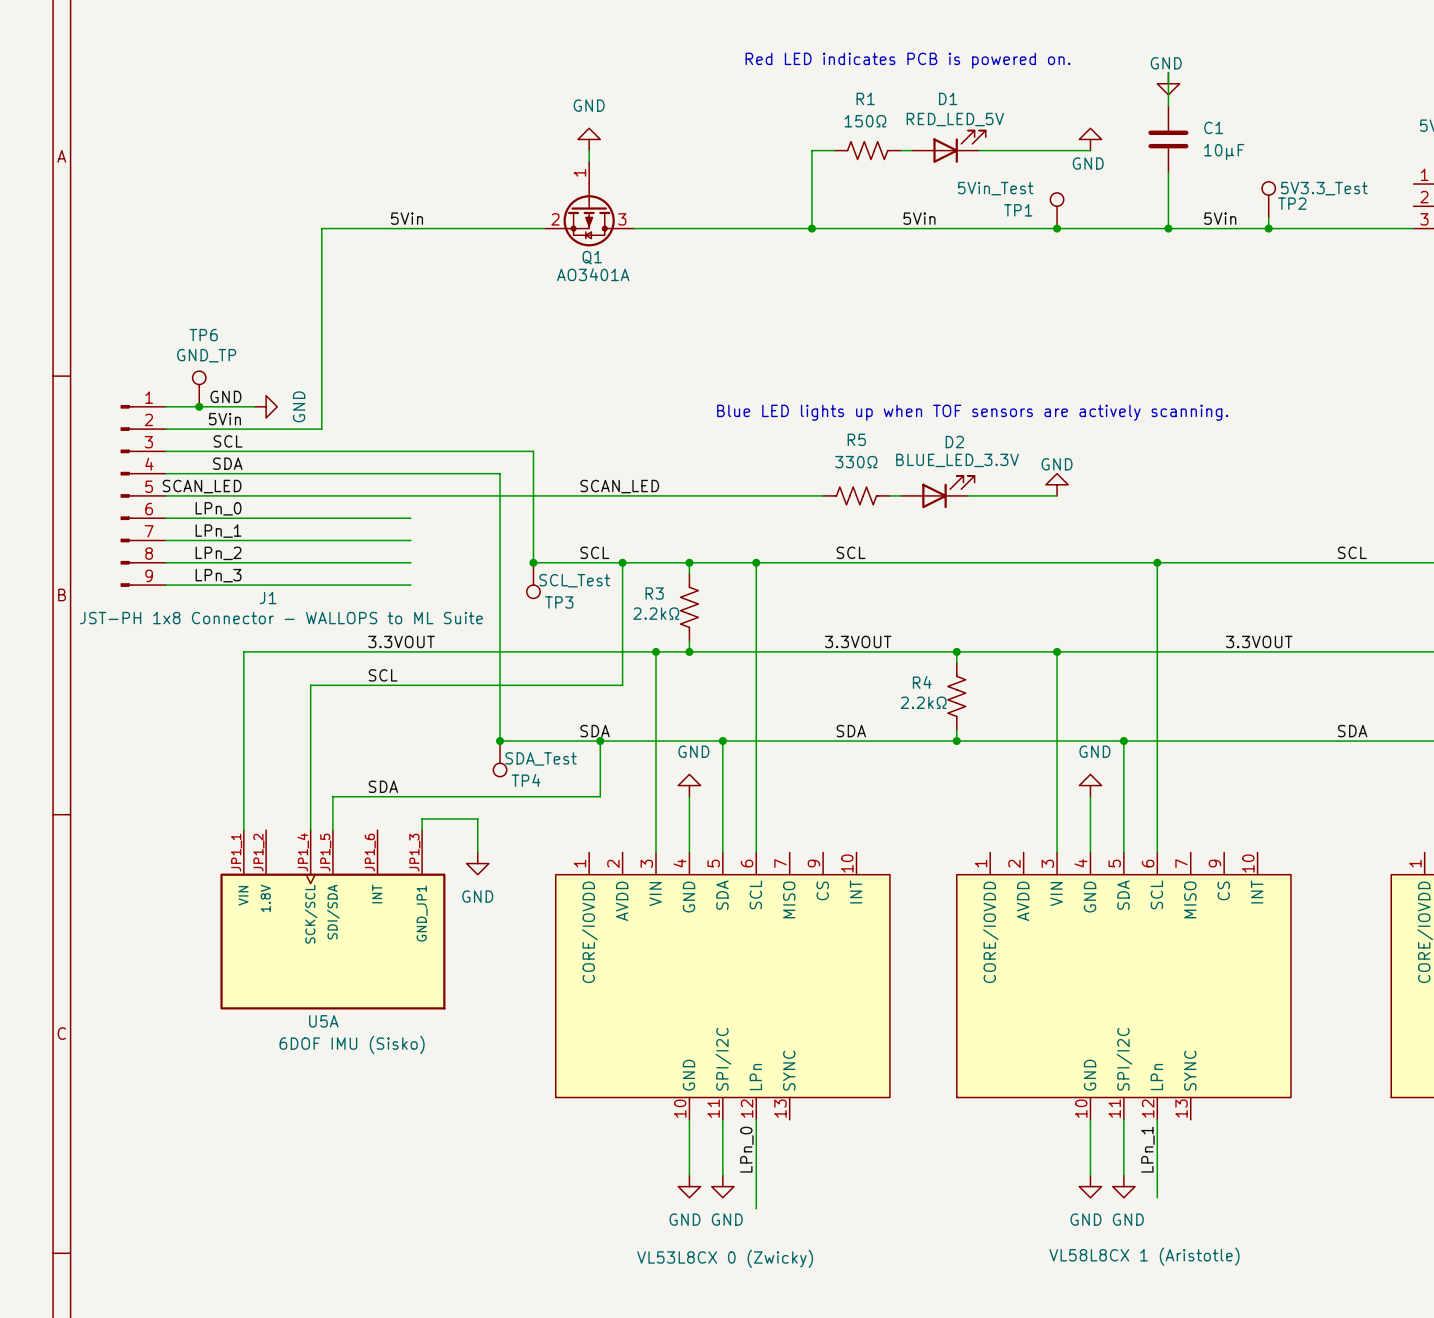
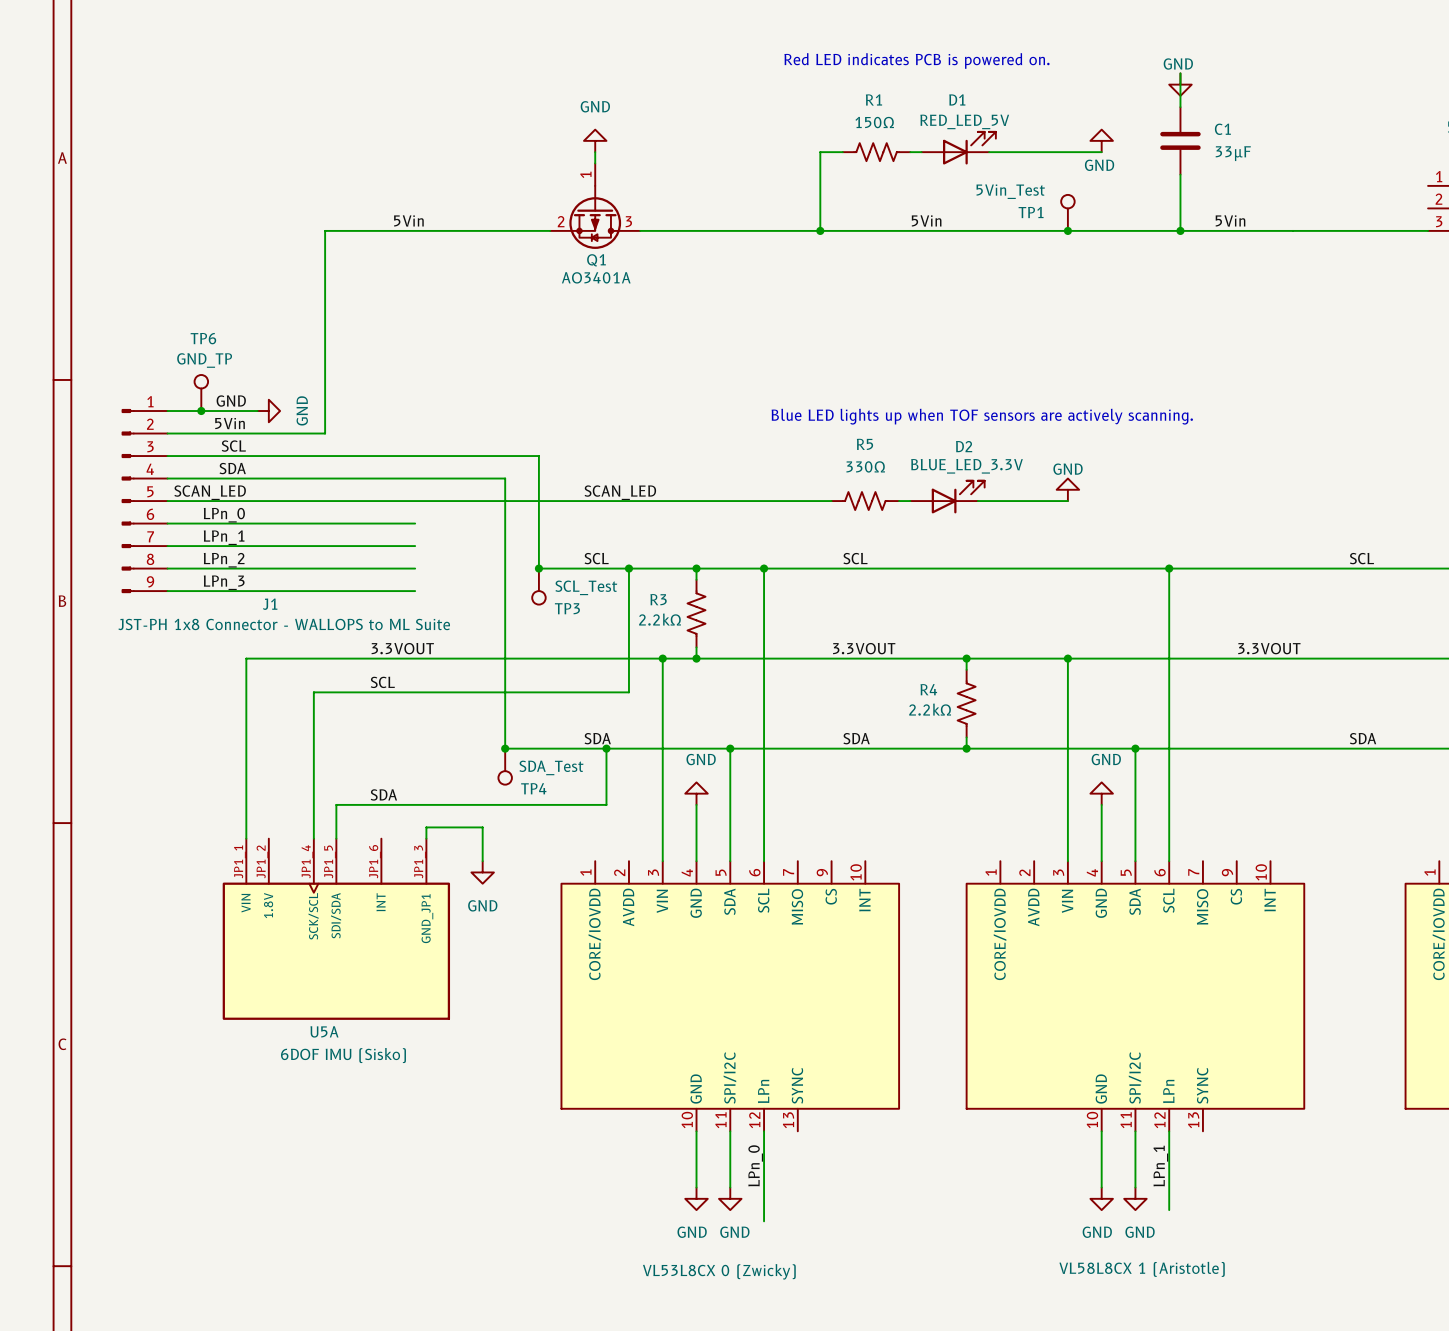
C1 value: 10µF (1224, 152) -> 33µF (1233, 153)
TP2: 5V3.3_Test (1268, 199) -> none
wire: (1268, 217) (1268, 228) -> none
junction: (1268, 228) -> none

